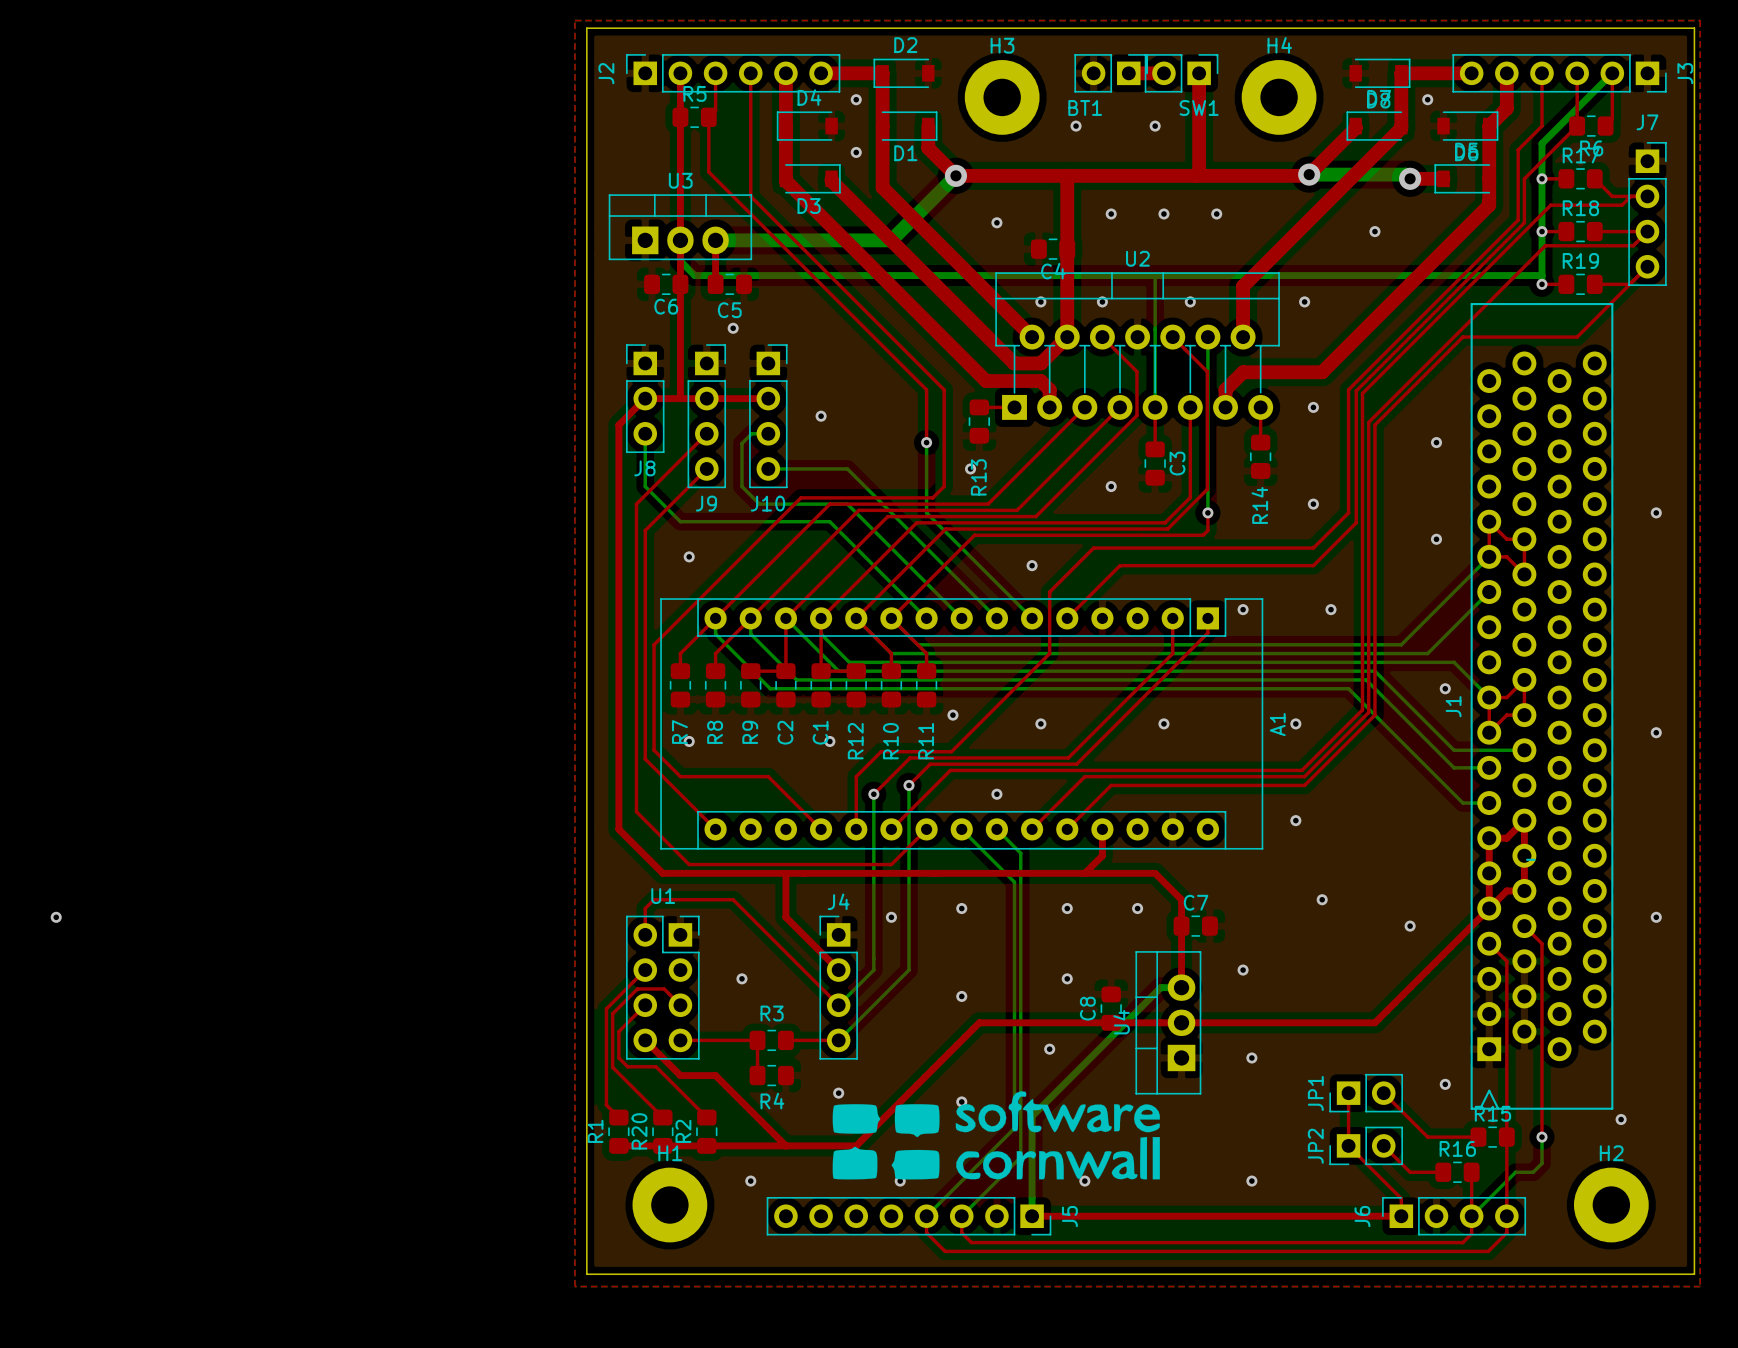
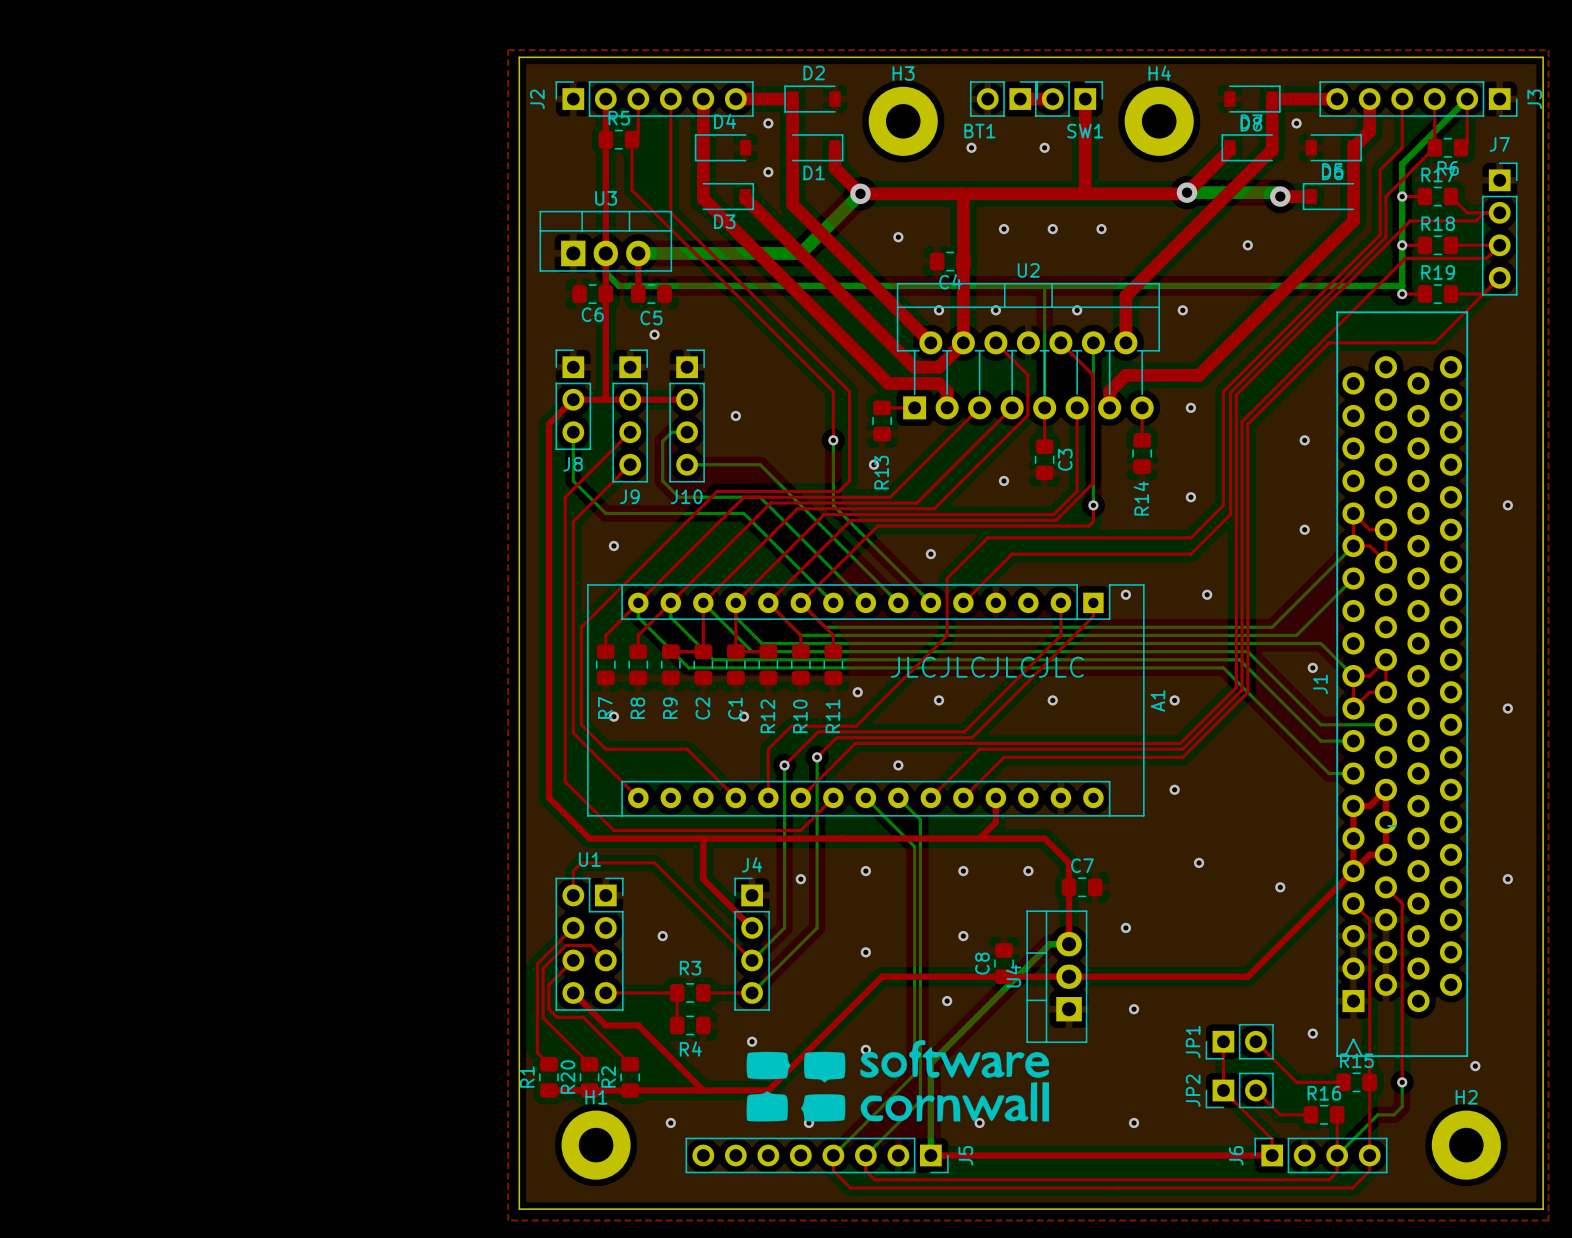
drawing: none -> [890, 656, 1084, 678]
via: (56, 917) -> none

